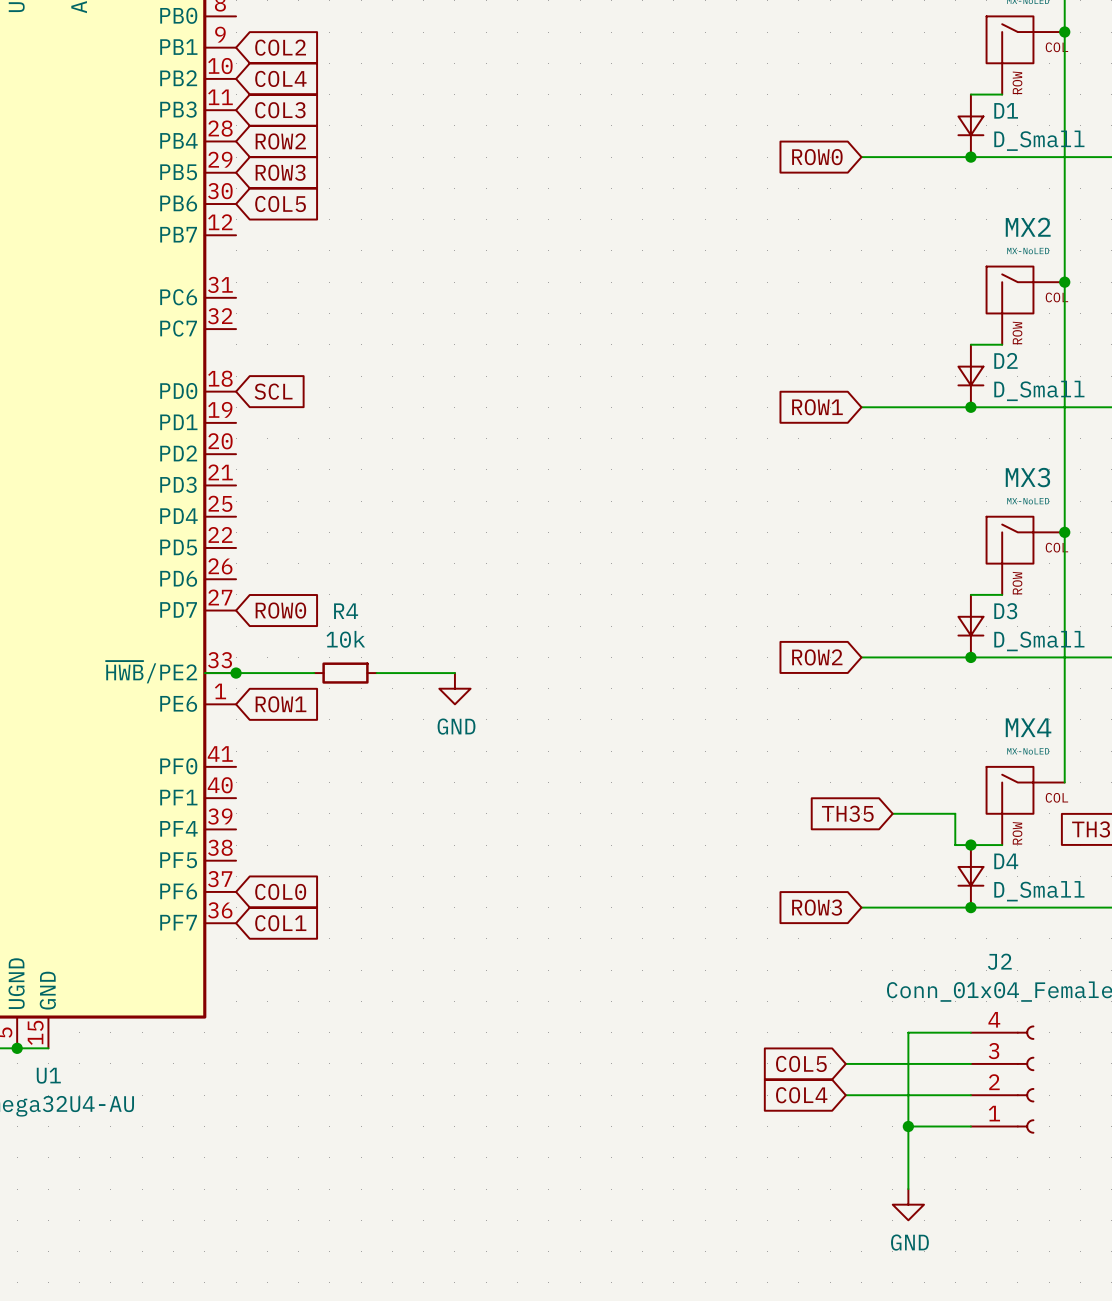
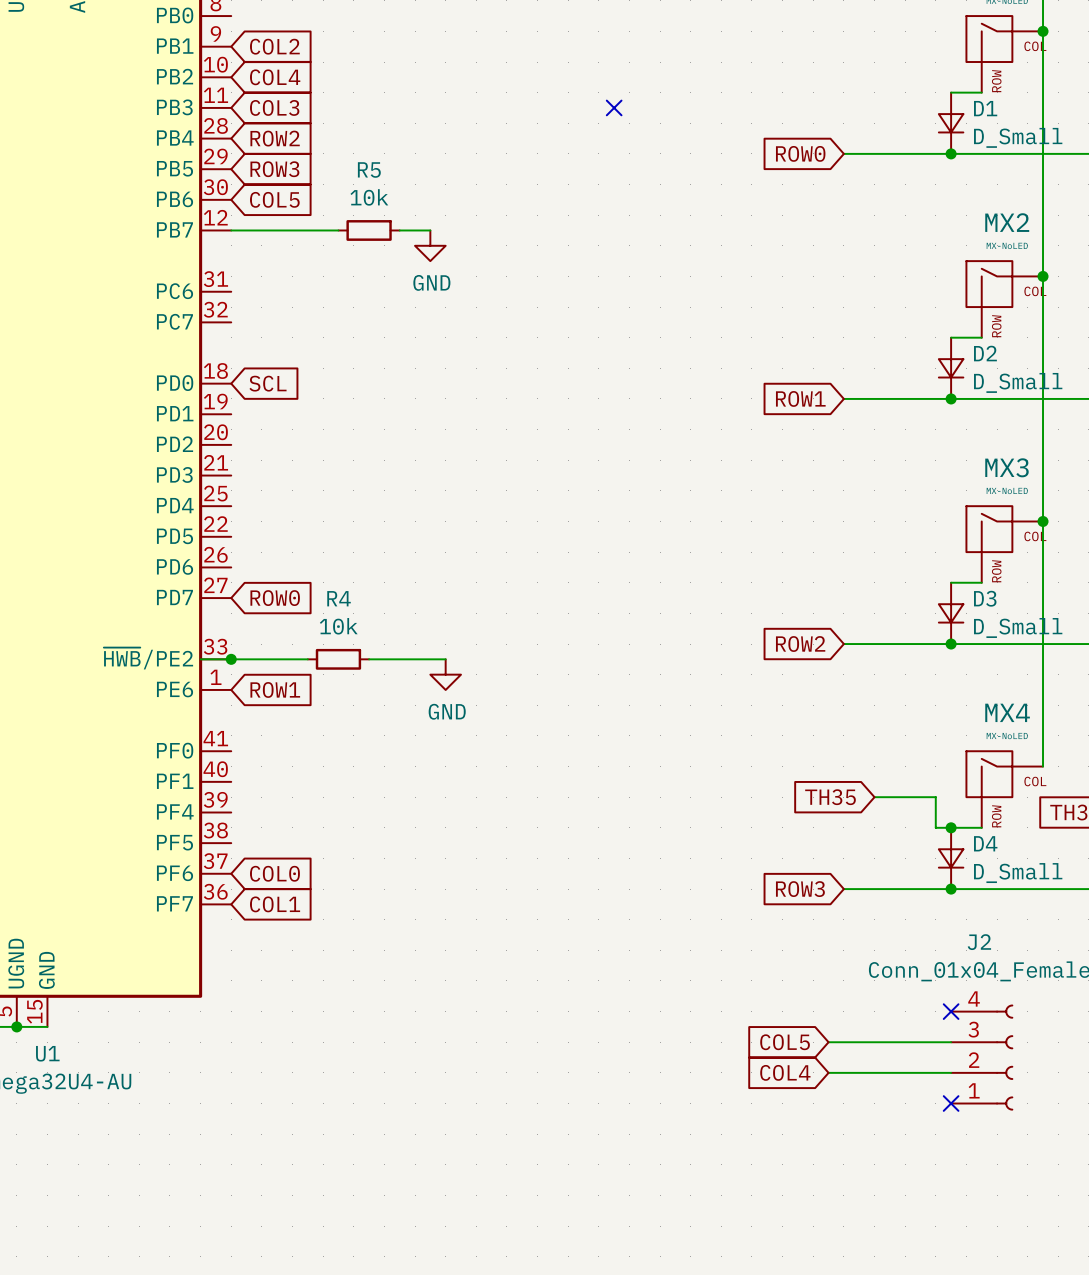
no-connect mark: none -> (614, 107)
wire: none -> (231, 230) (338, 230)
R5: none -> 10k (369, 230)
wire: none -> (399, 230) (430, 230)
power symbol: none -> GND (430, 245)
wire: (970, 1032) (908, 1032) (908, 1189) -> none
no-connect mark: none -> (951, 1011)
wire: (908, 1126) (970, 1126) -> none
junction: (908, 1126) -> none
no-connect mark: none -> (951, 1103)
power symbol: GND (908, 1204) -> none

